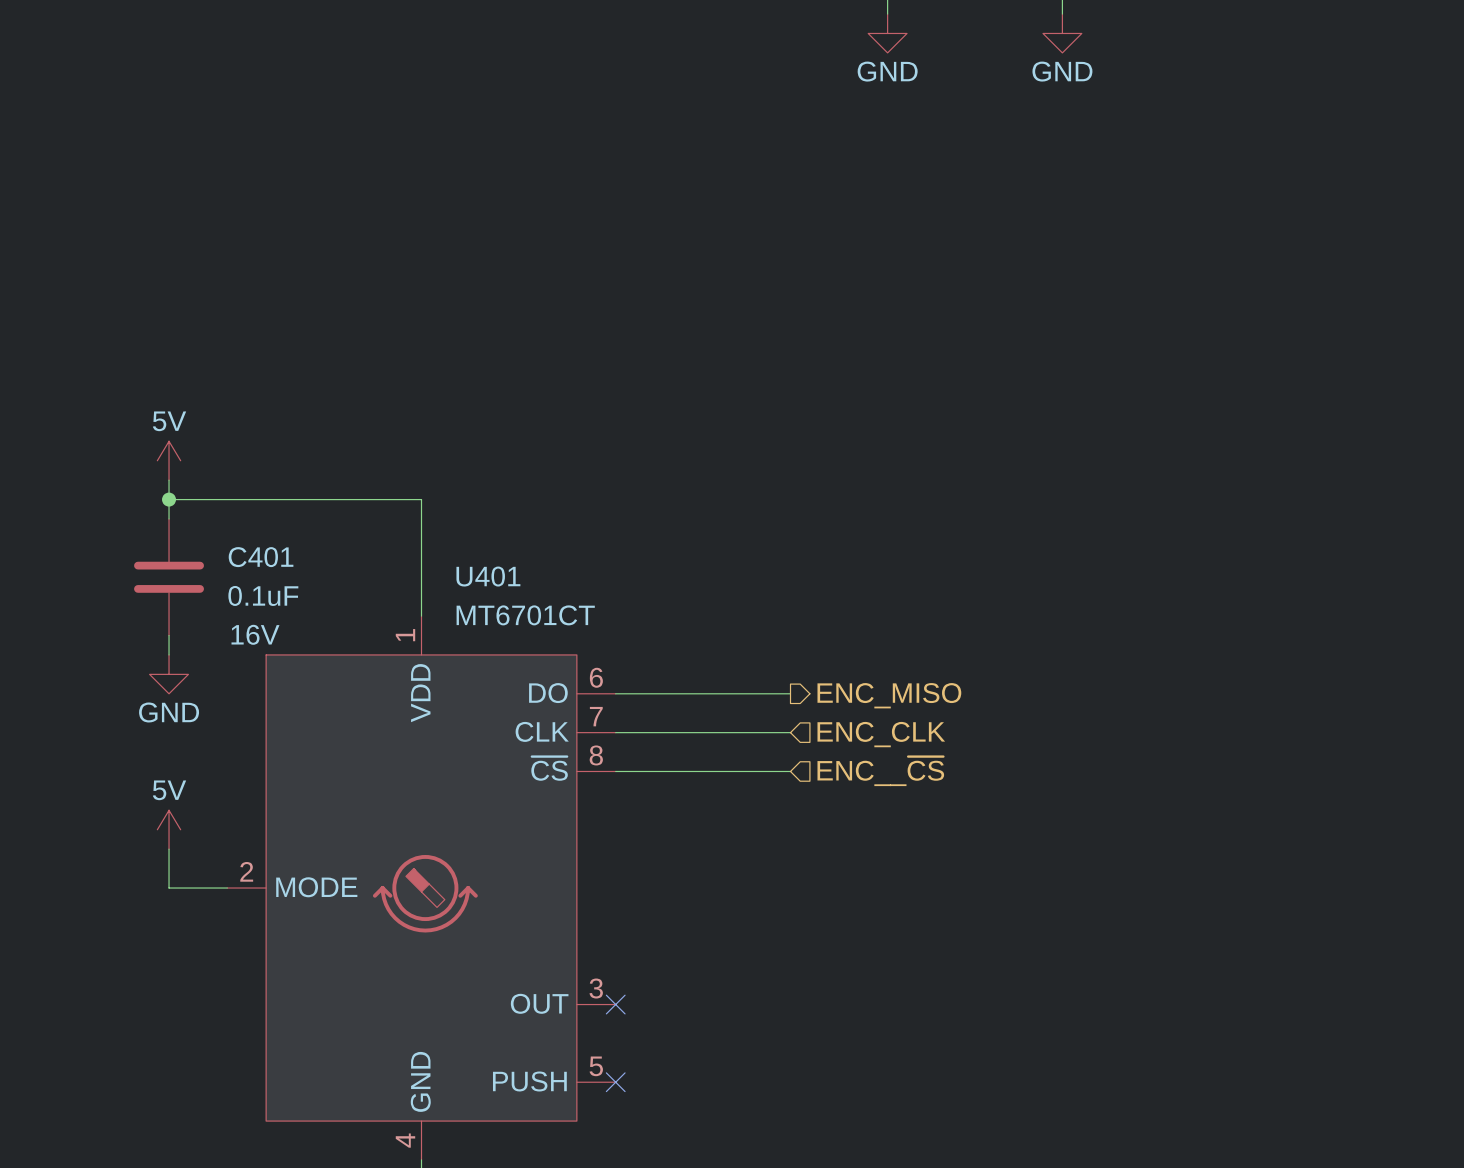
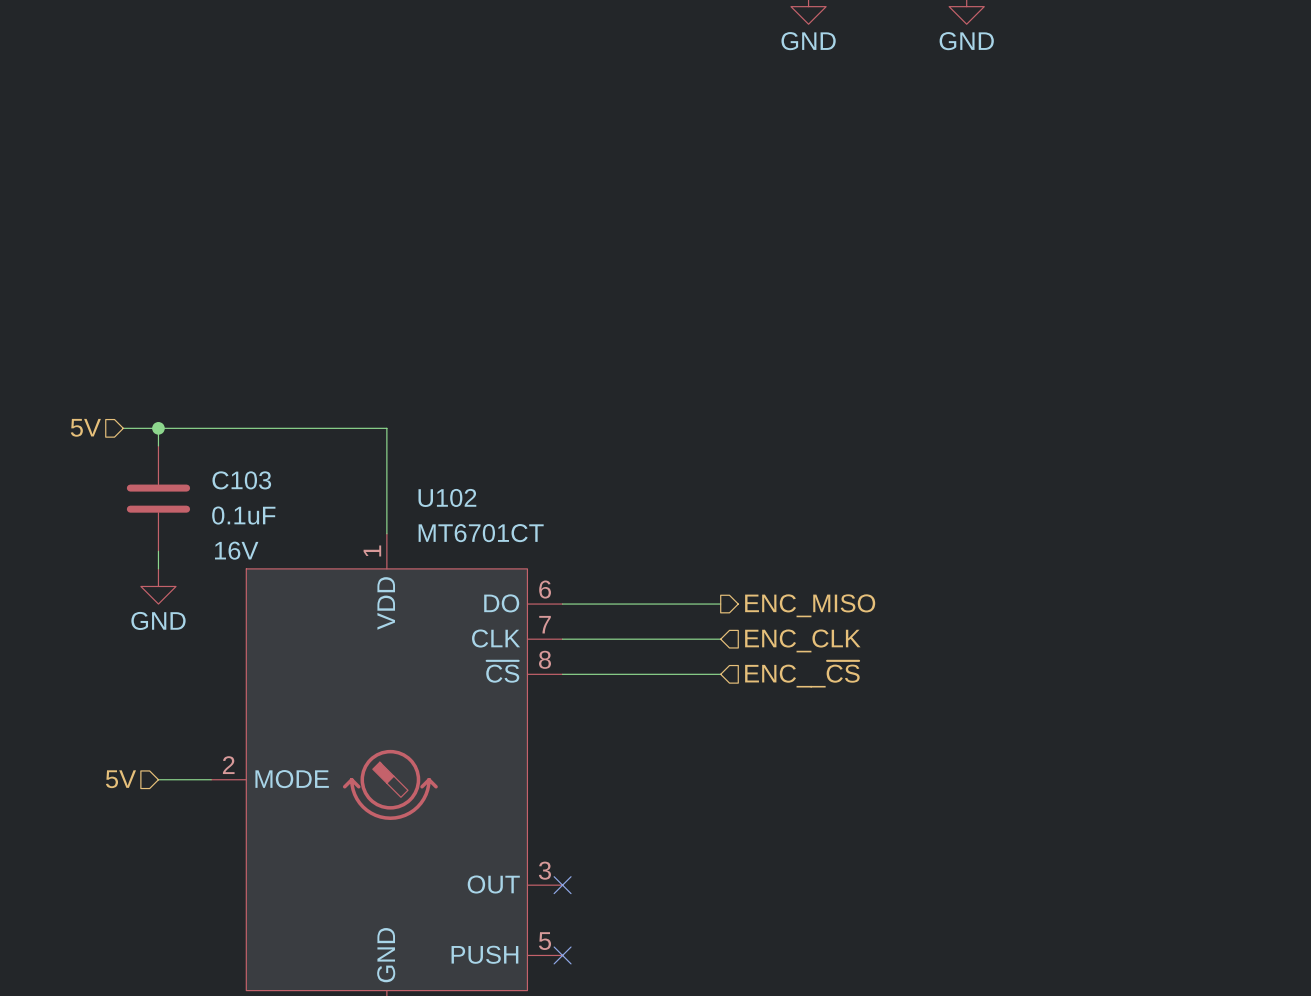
power symbol: 5V (169, 460) -> none
wire: (169, 480) (169, 499) -> (123, 428) (158, 428)
hierarchical label: none -> 5V (85, 427)
C401 name: C401 (261, 557) -> C103 (241, 480)
U401 name: U401 (488, 576) -> U102 (447, 497)
power symbol: 5V (169, 829) -> none
wire: (169, 849) (169, 888) -> none
hierarchical label: none -> 5V (120, 779)

